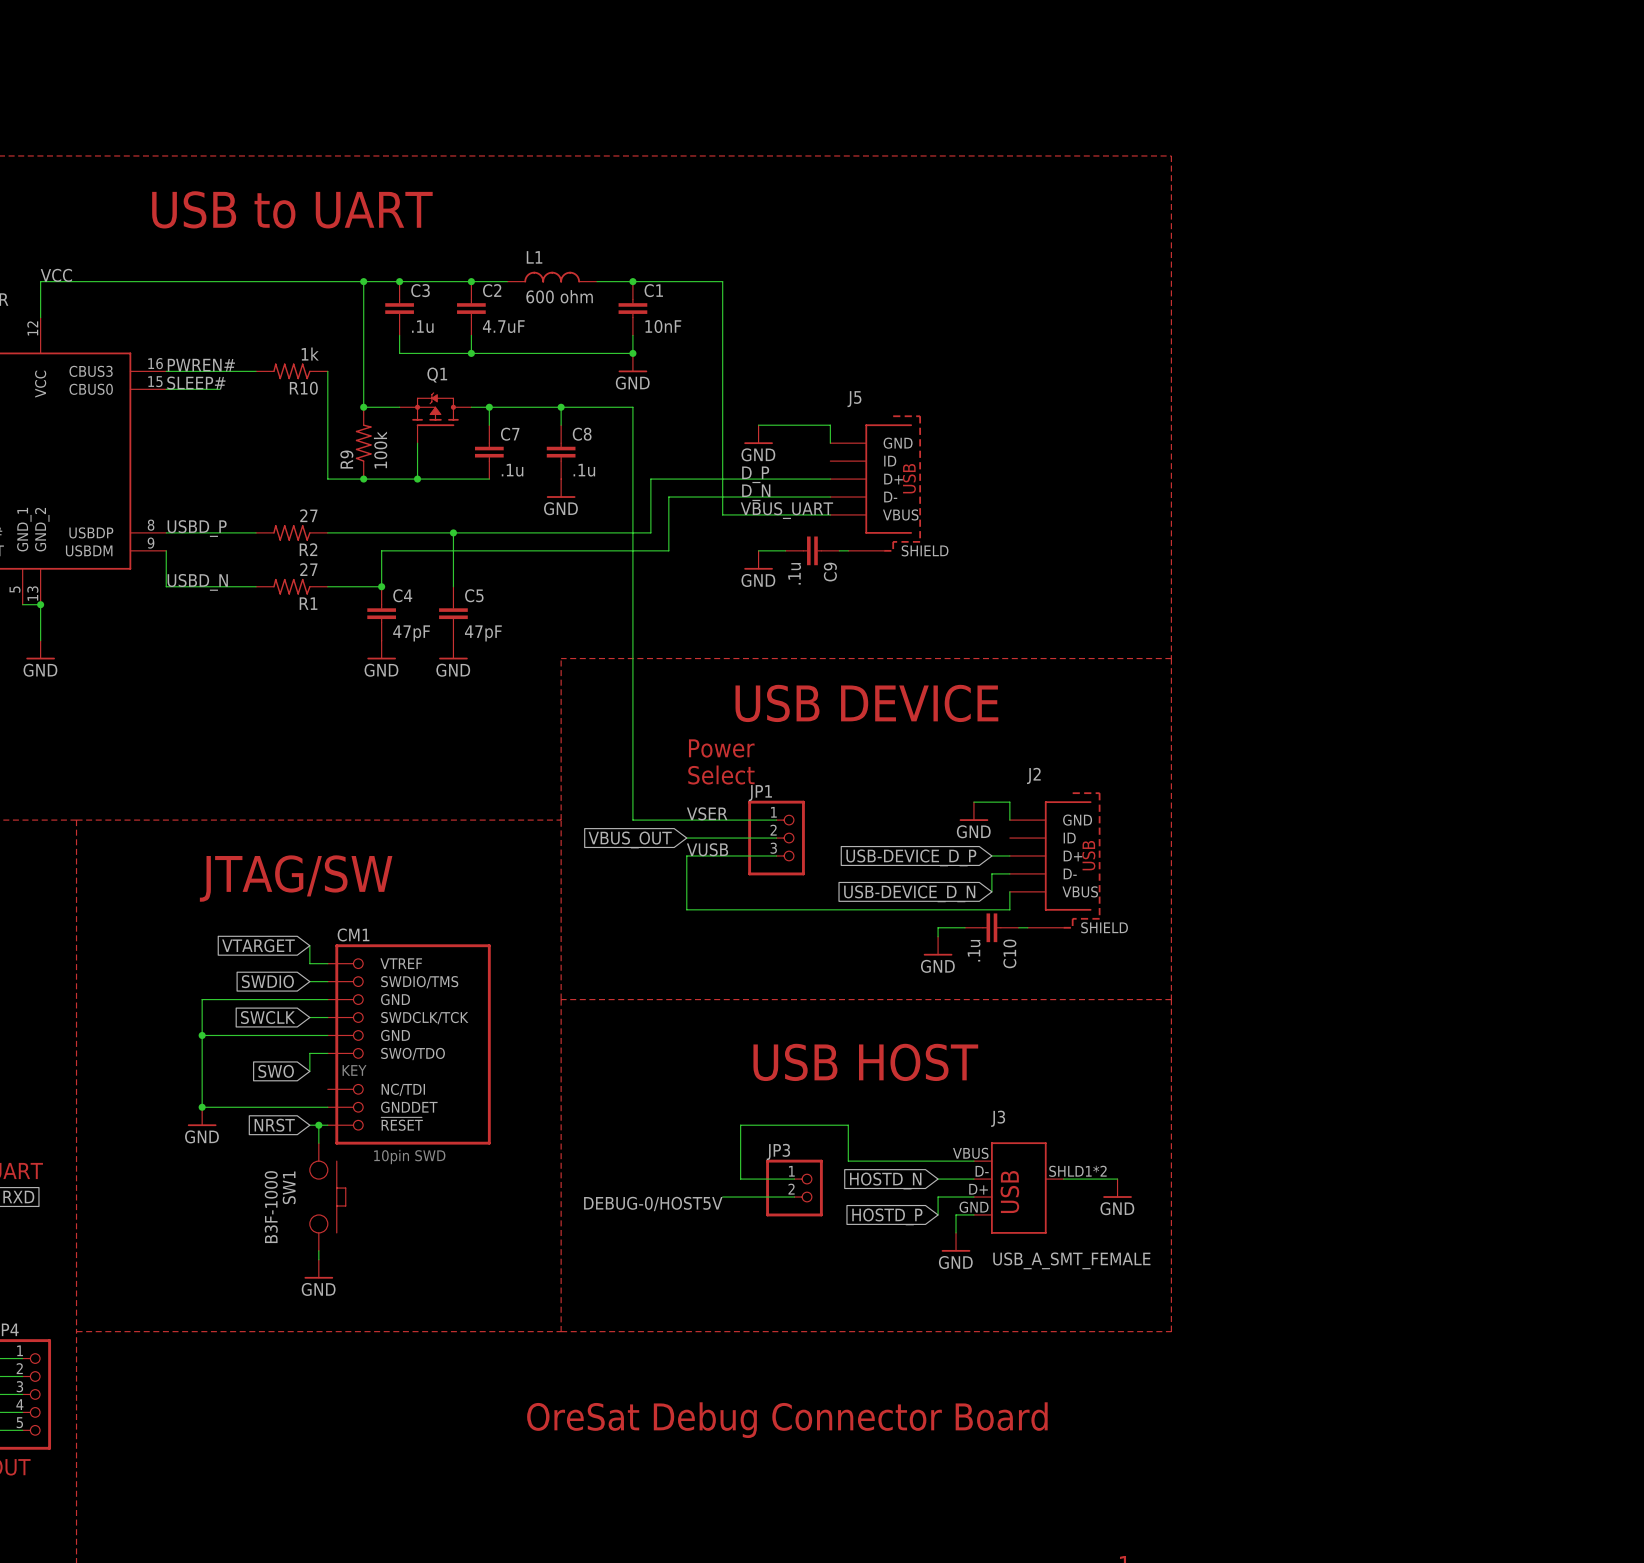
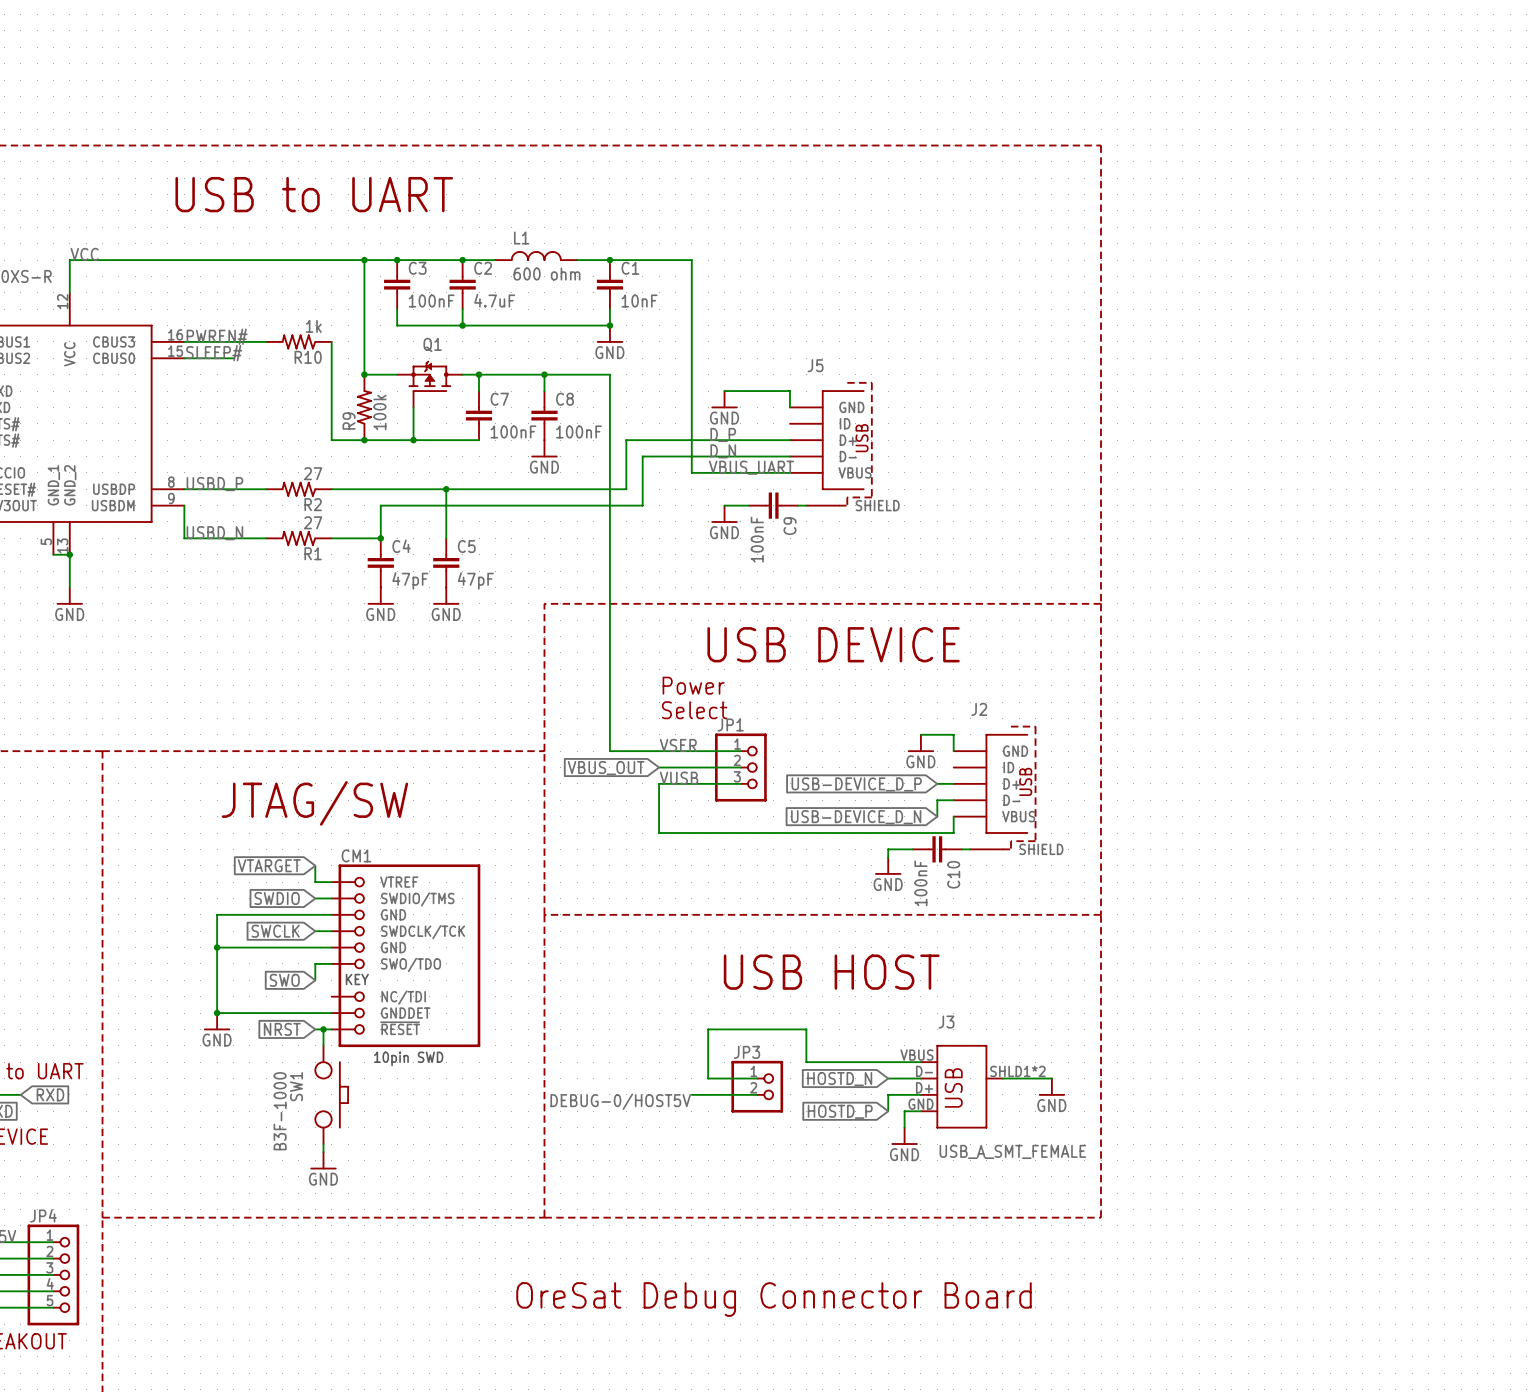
C3 value: .1u (422, 326) -> 100nF (431, 301)
C7 value: .1u (512, 470) -> 100nF (513, 431)
C8 value: .1u (584, 470) -> 100nF (578, 431)
C9 value: .1u (794, 573) -> 100nF (757, 539)
C10 value: .1u (974, 950) -> 100nF (920, 883)

